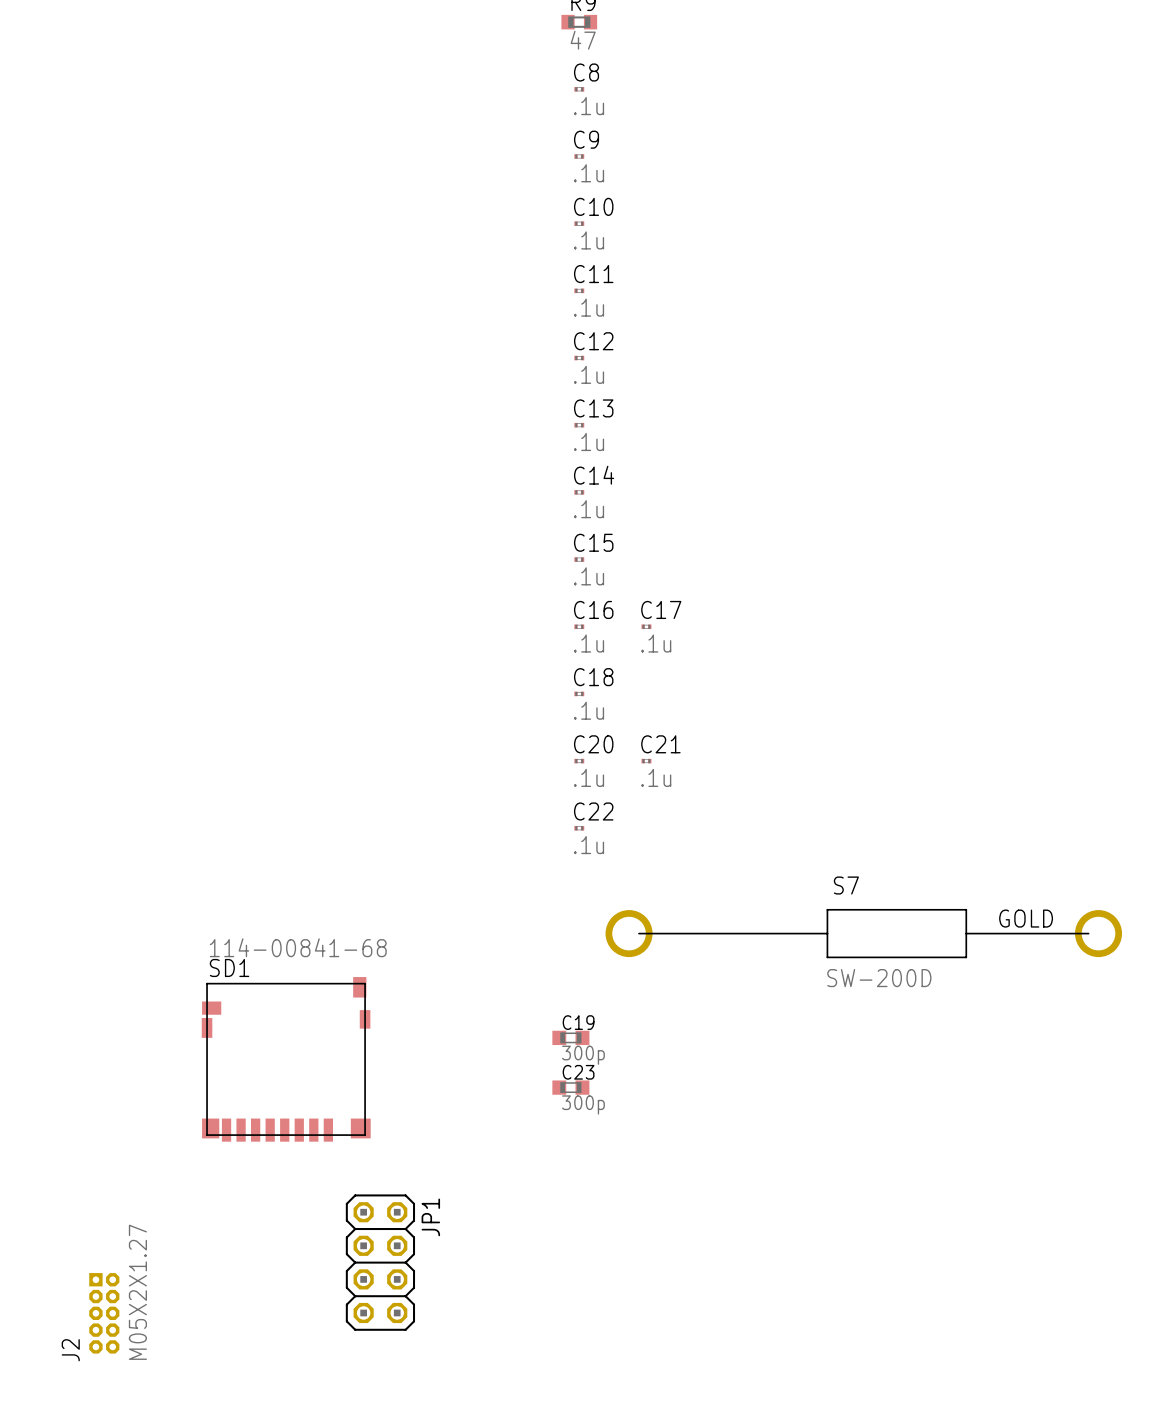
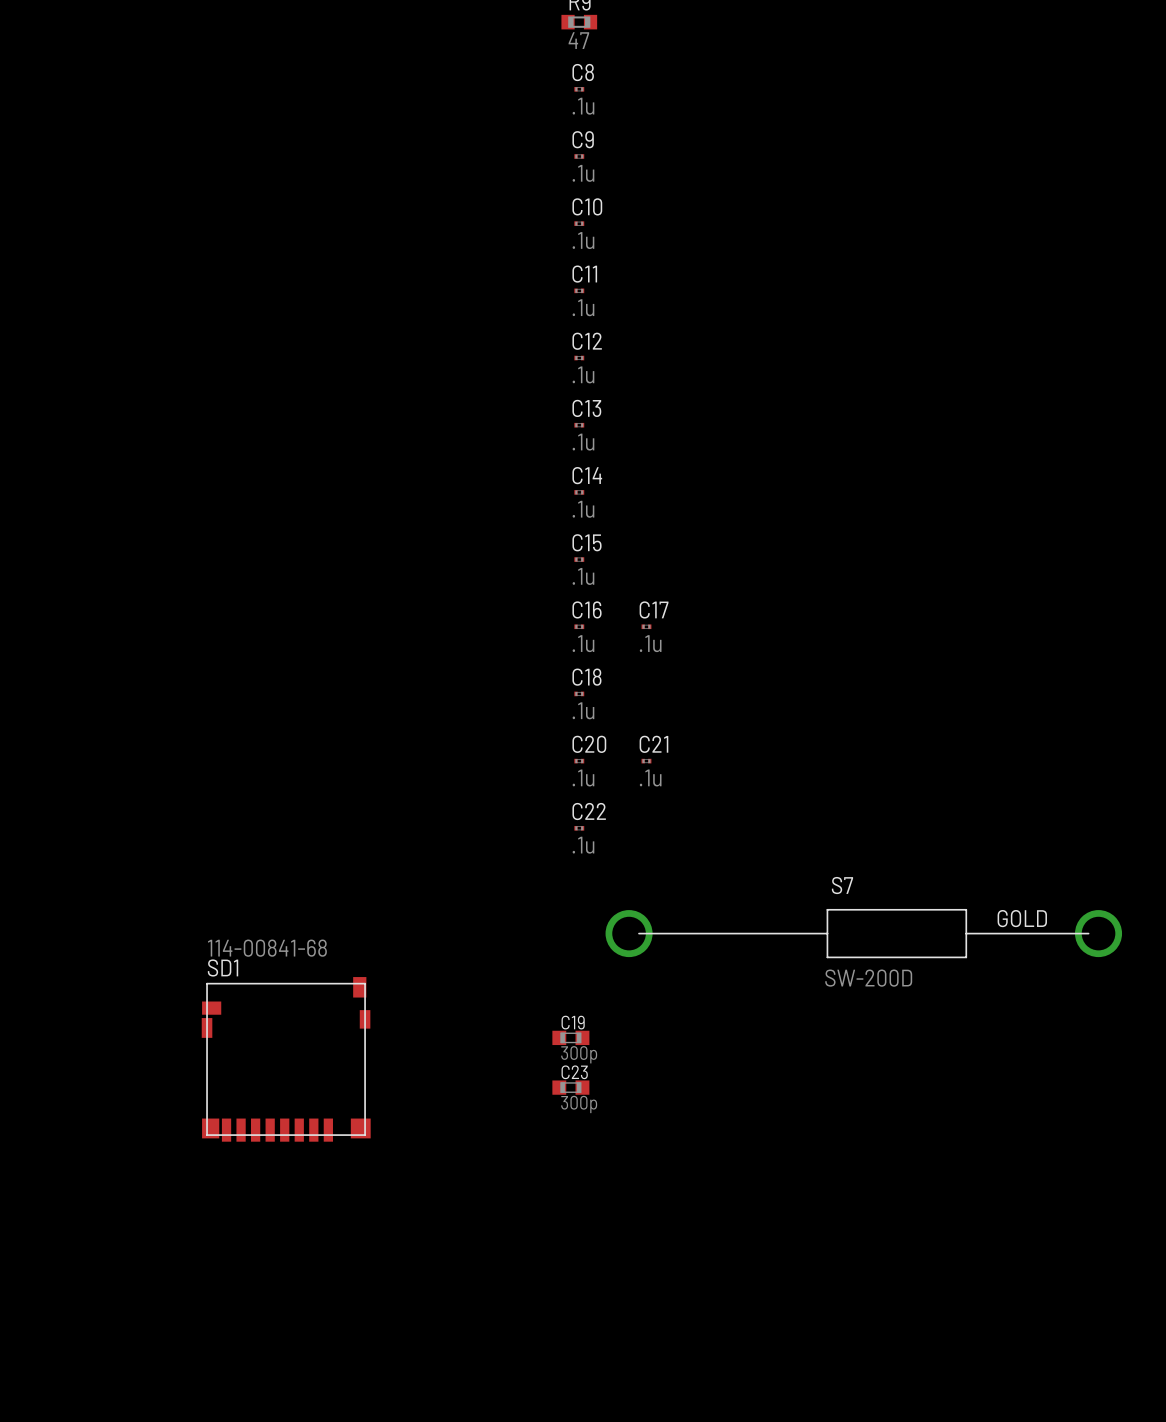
JP1: (380, 1262) -> none
J2: M05X2X1.27 (104, 1313) -> none

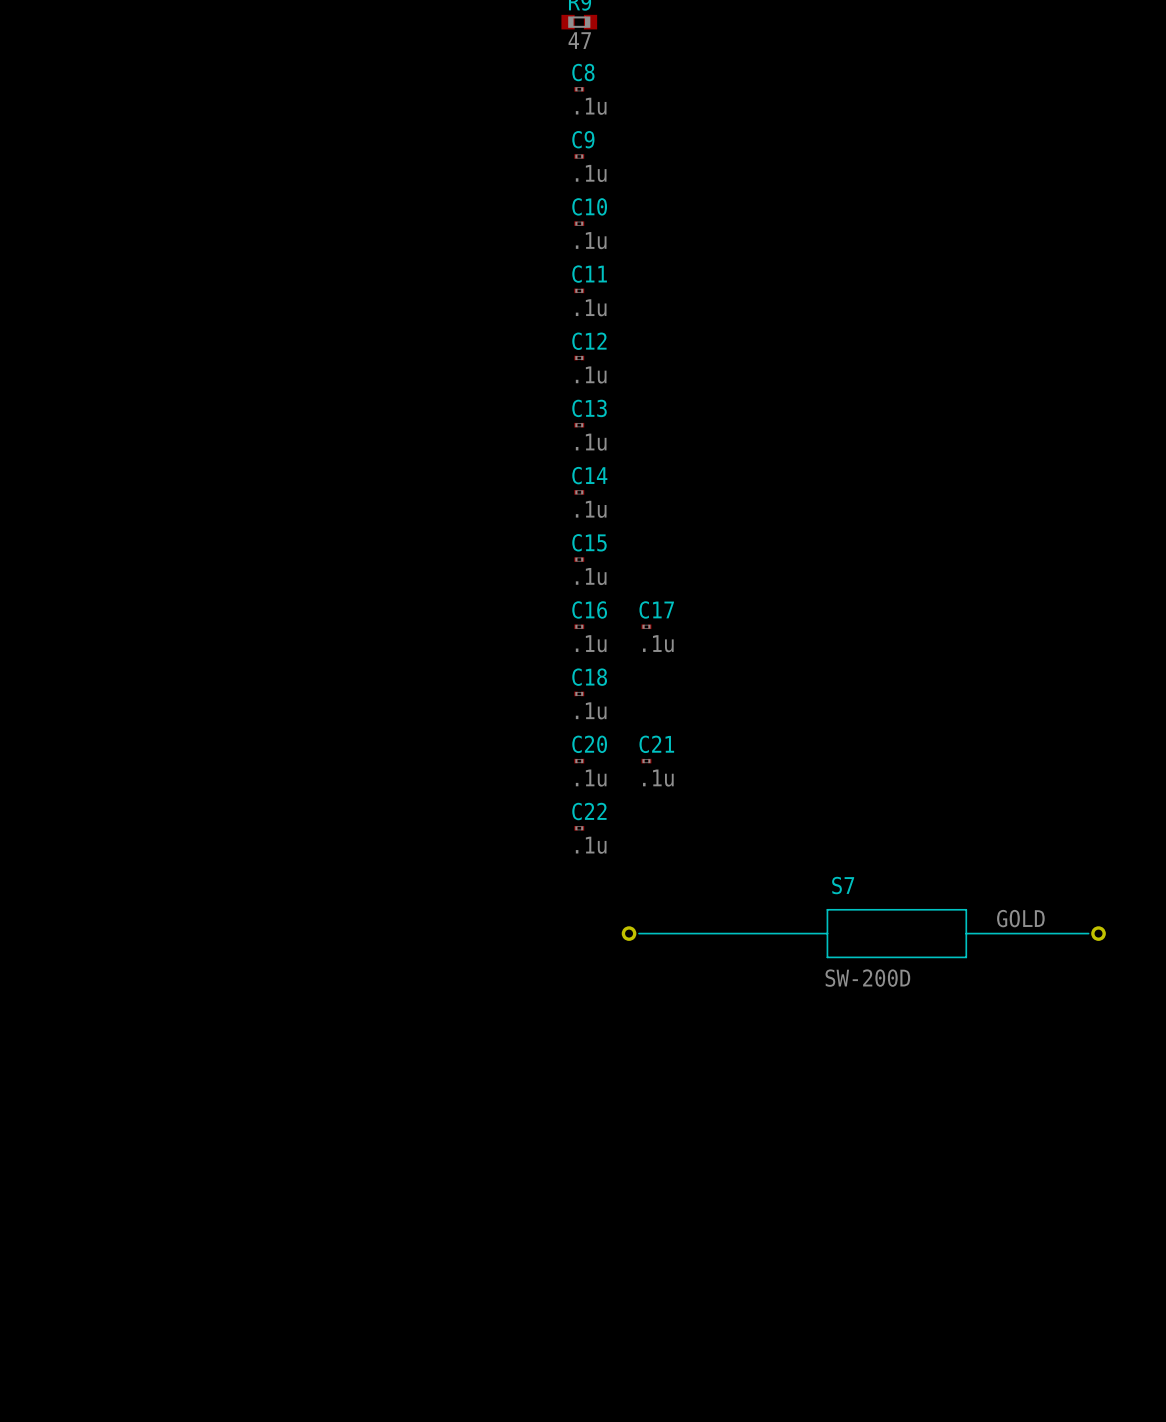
S7 footprint: [605, 908, 1123, 959] -> [621, 908, 1106, 959]
C19: 300p (570, 1037) -> none
SD1: 114-00841-68 (286, 1059) -> none
C23: 300p (570, 1087) -> none

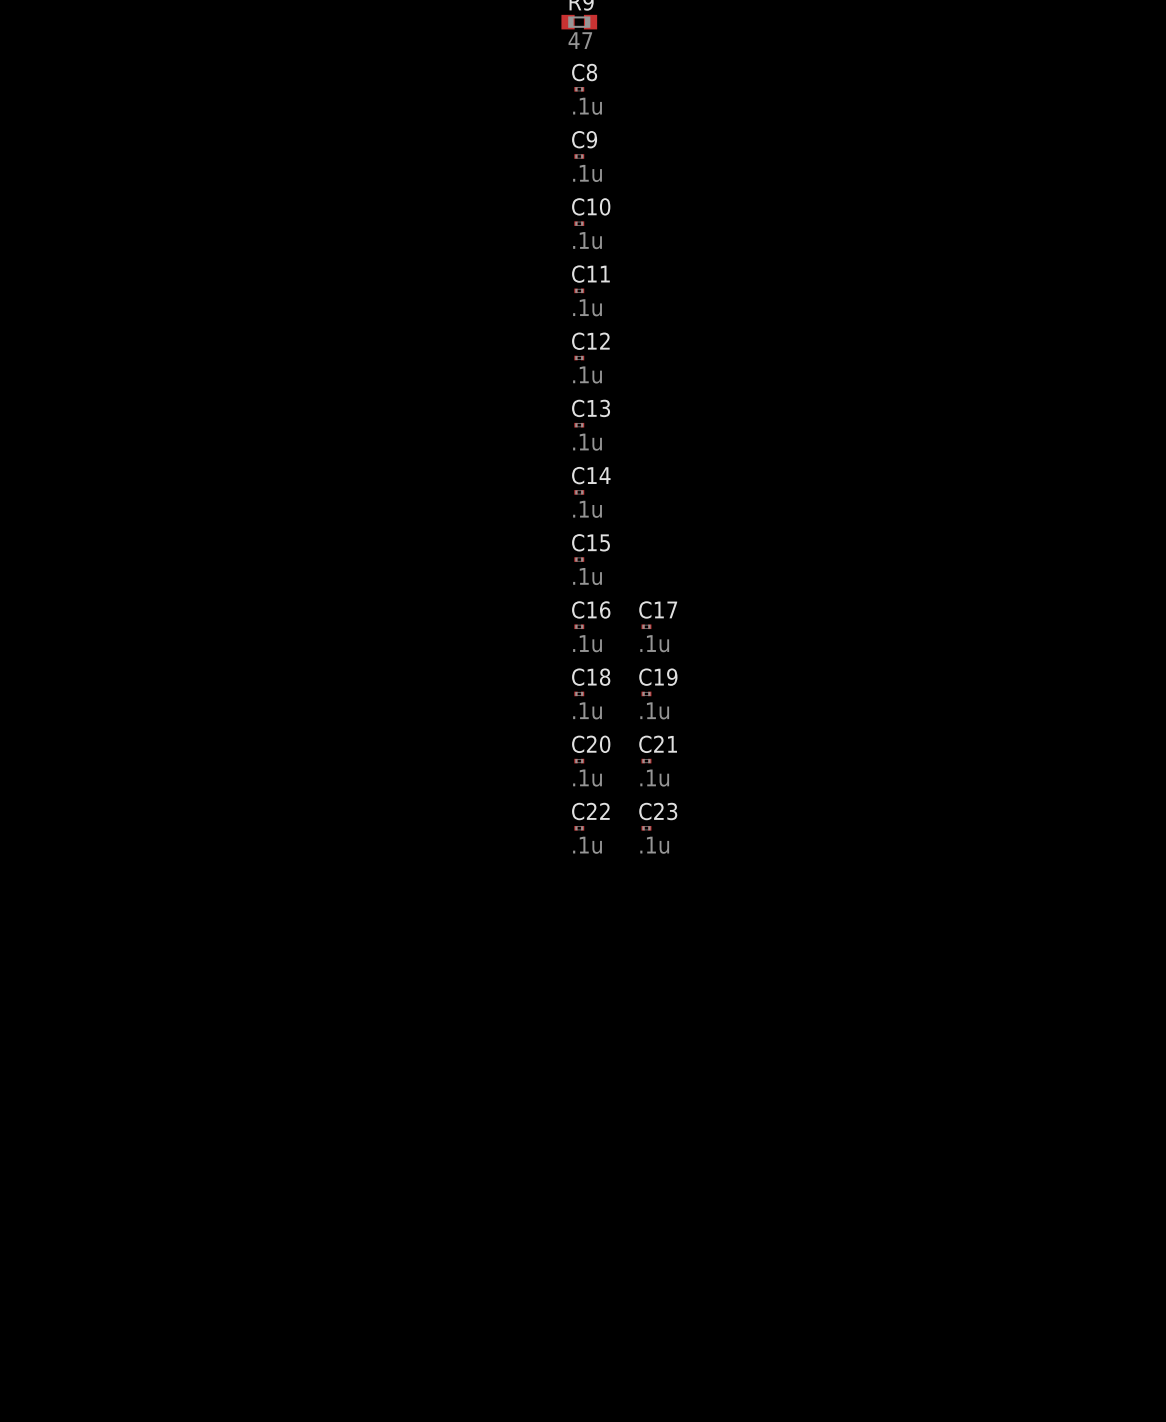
C19: none -> .1u (646, 693)
C23: none -> .1u (646, 828)
S7: SW-200D (863, 933) -> none

